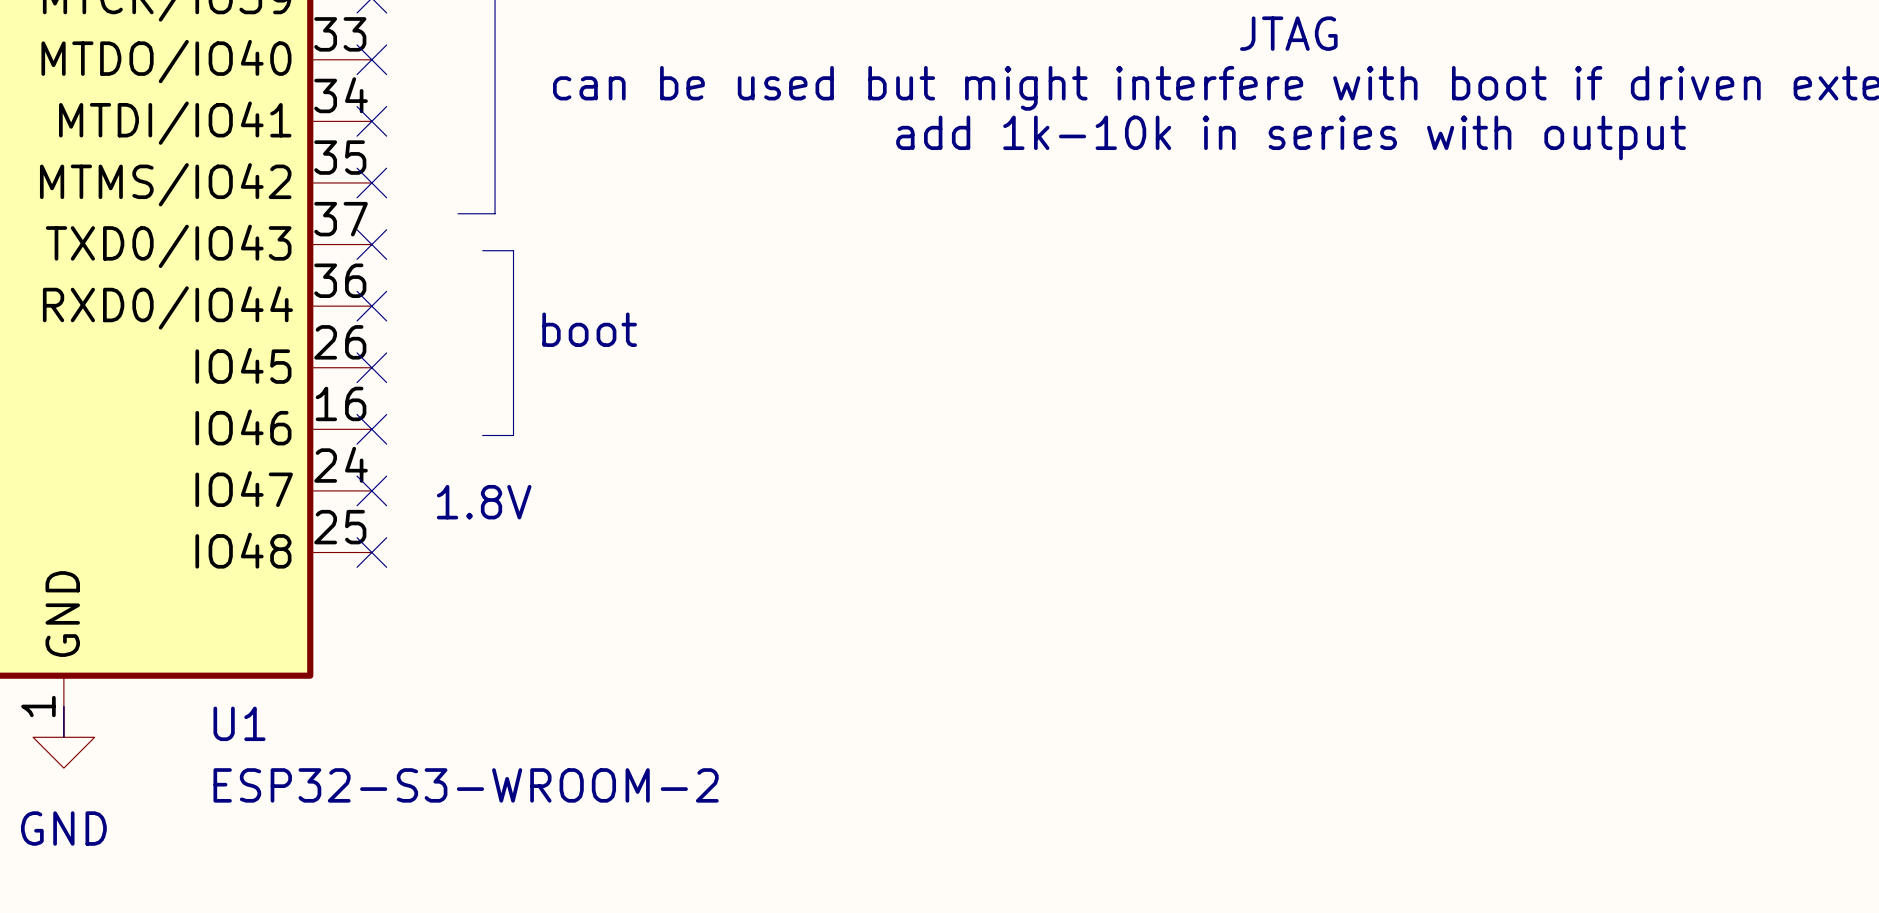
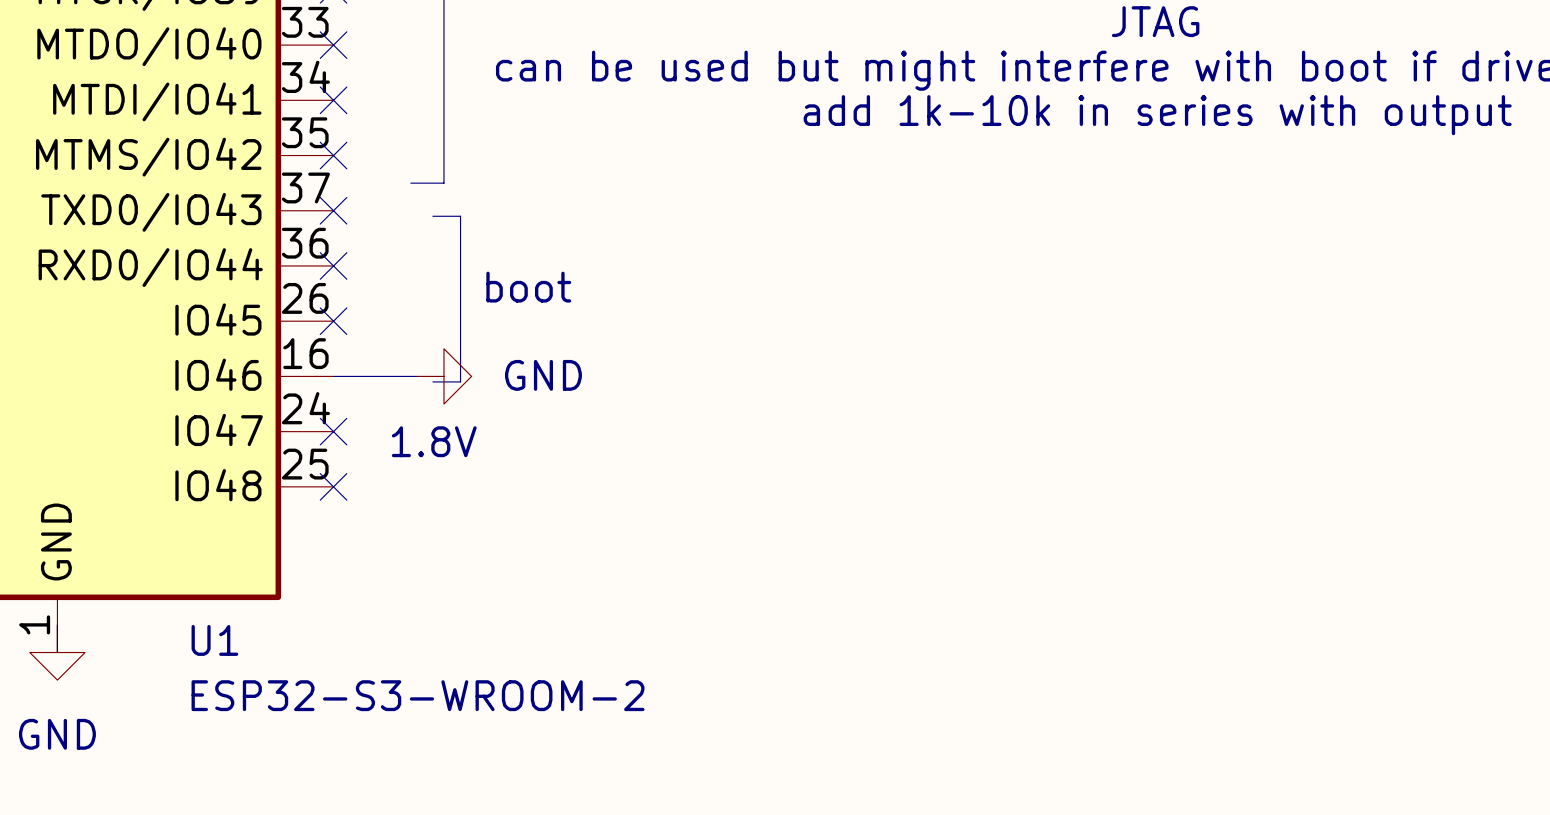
wire: none -> (333, 376) (416, 376)
no-connect mark: (371, 429) -> none
power symbol: none -> GND (443, 376)

